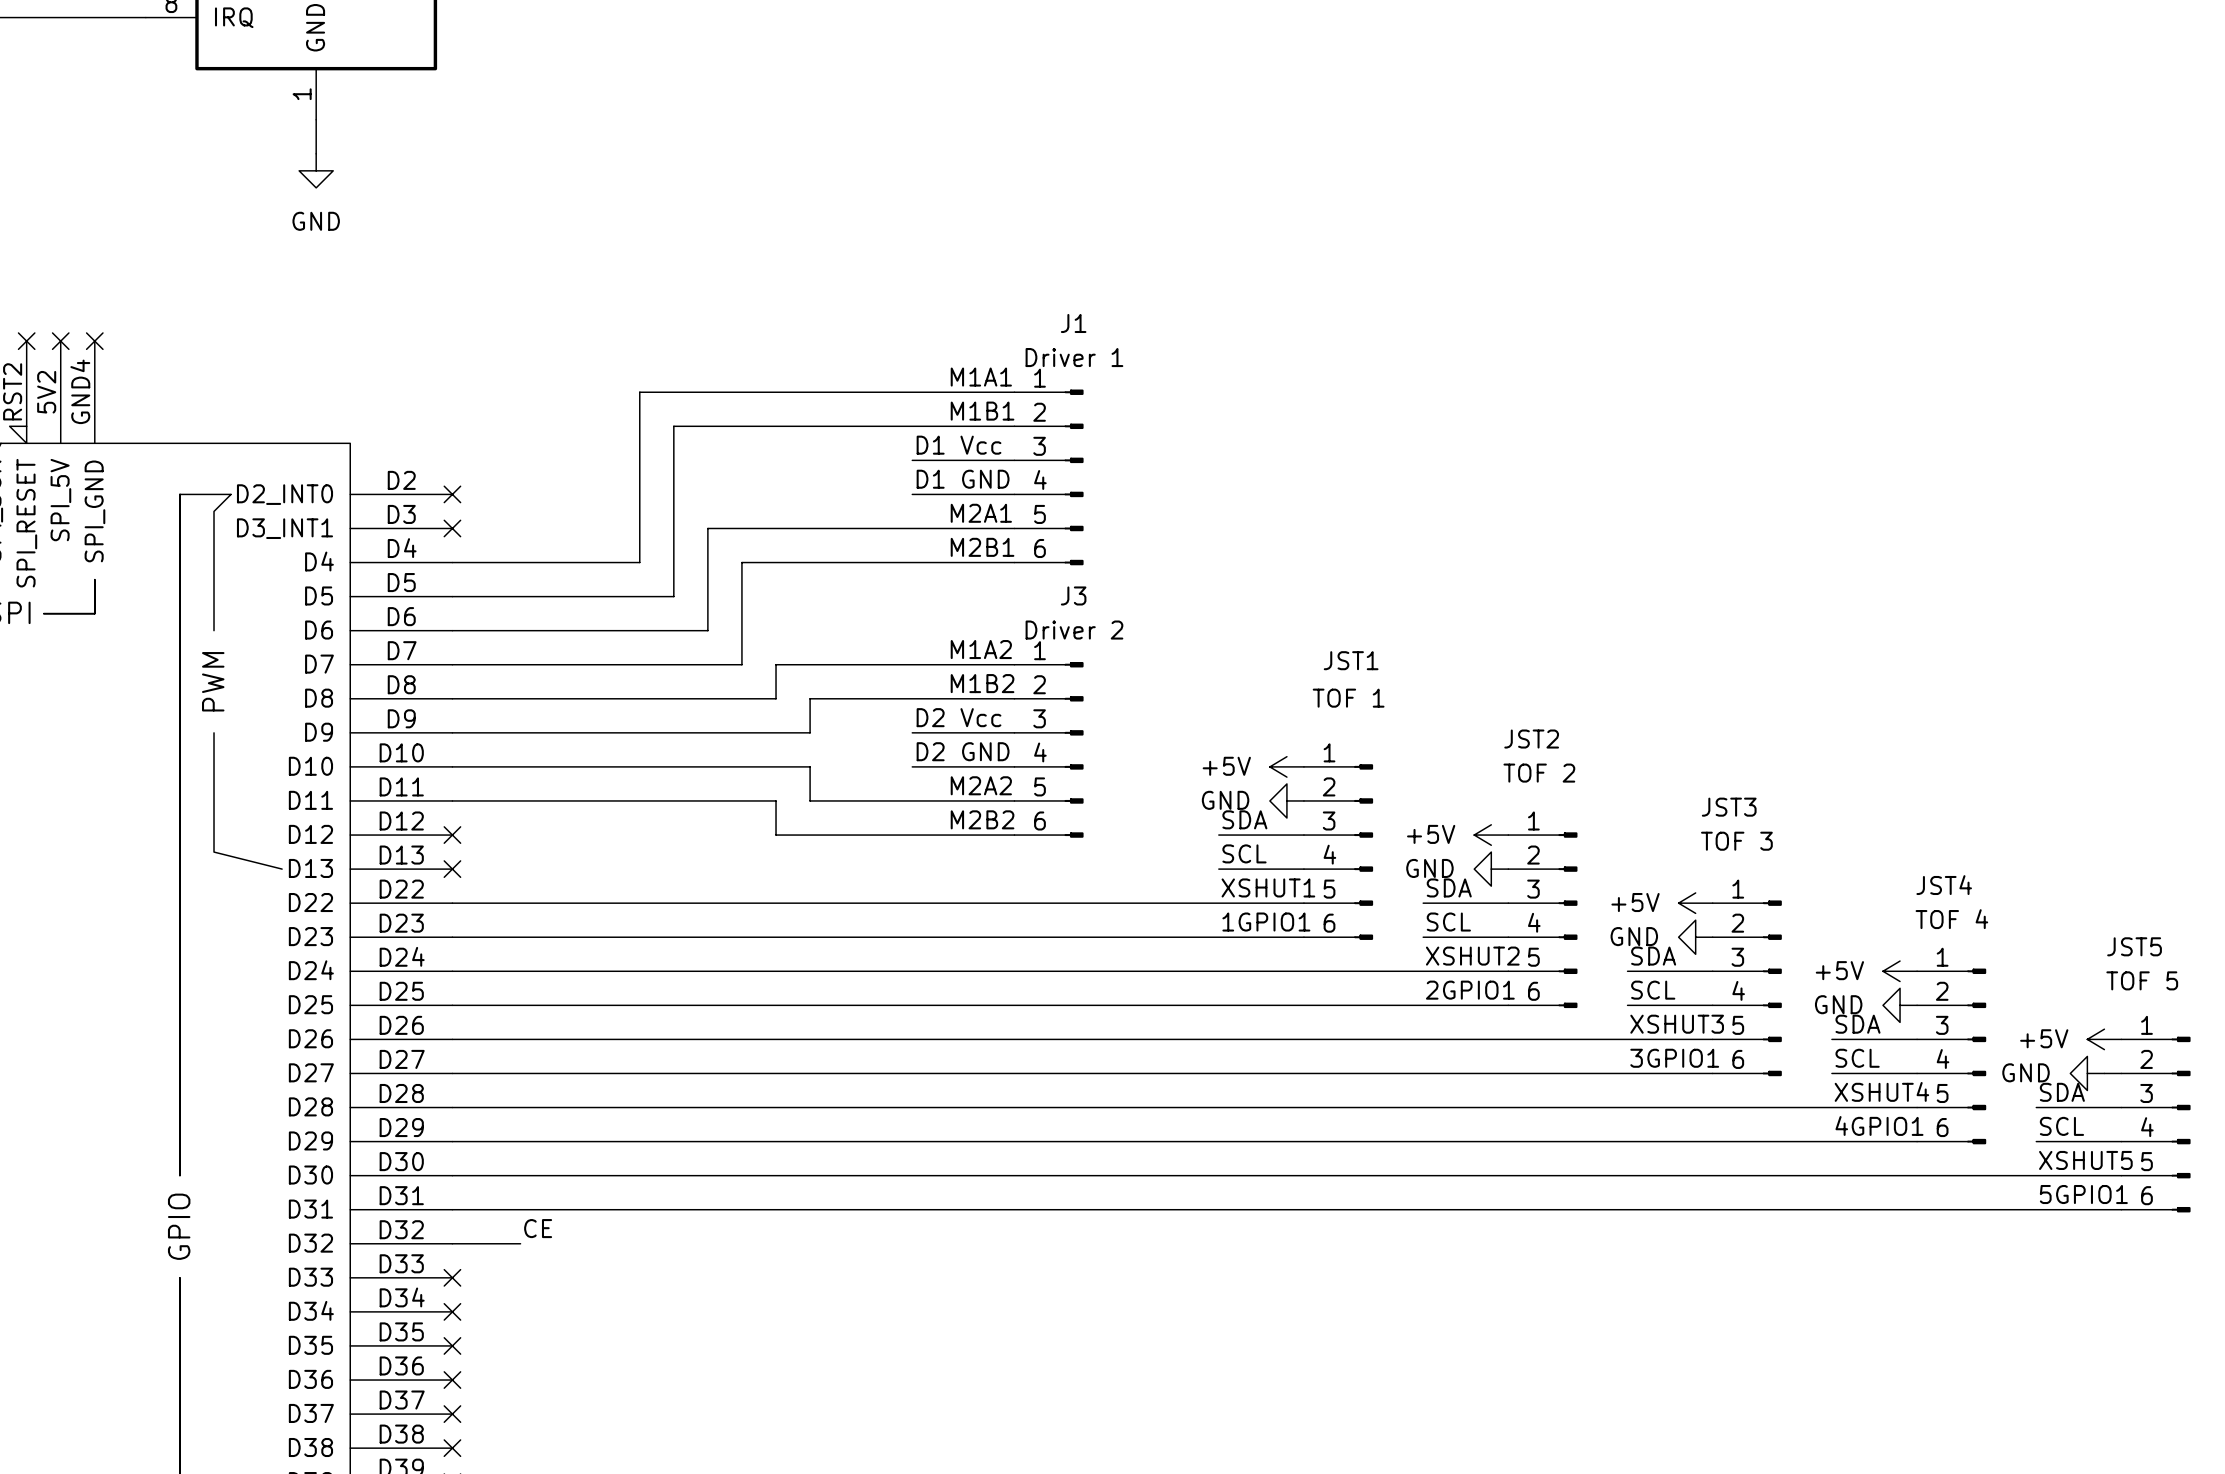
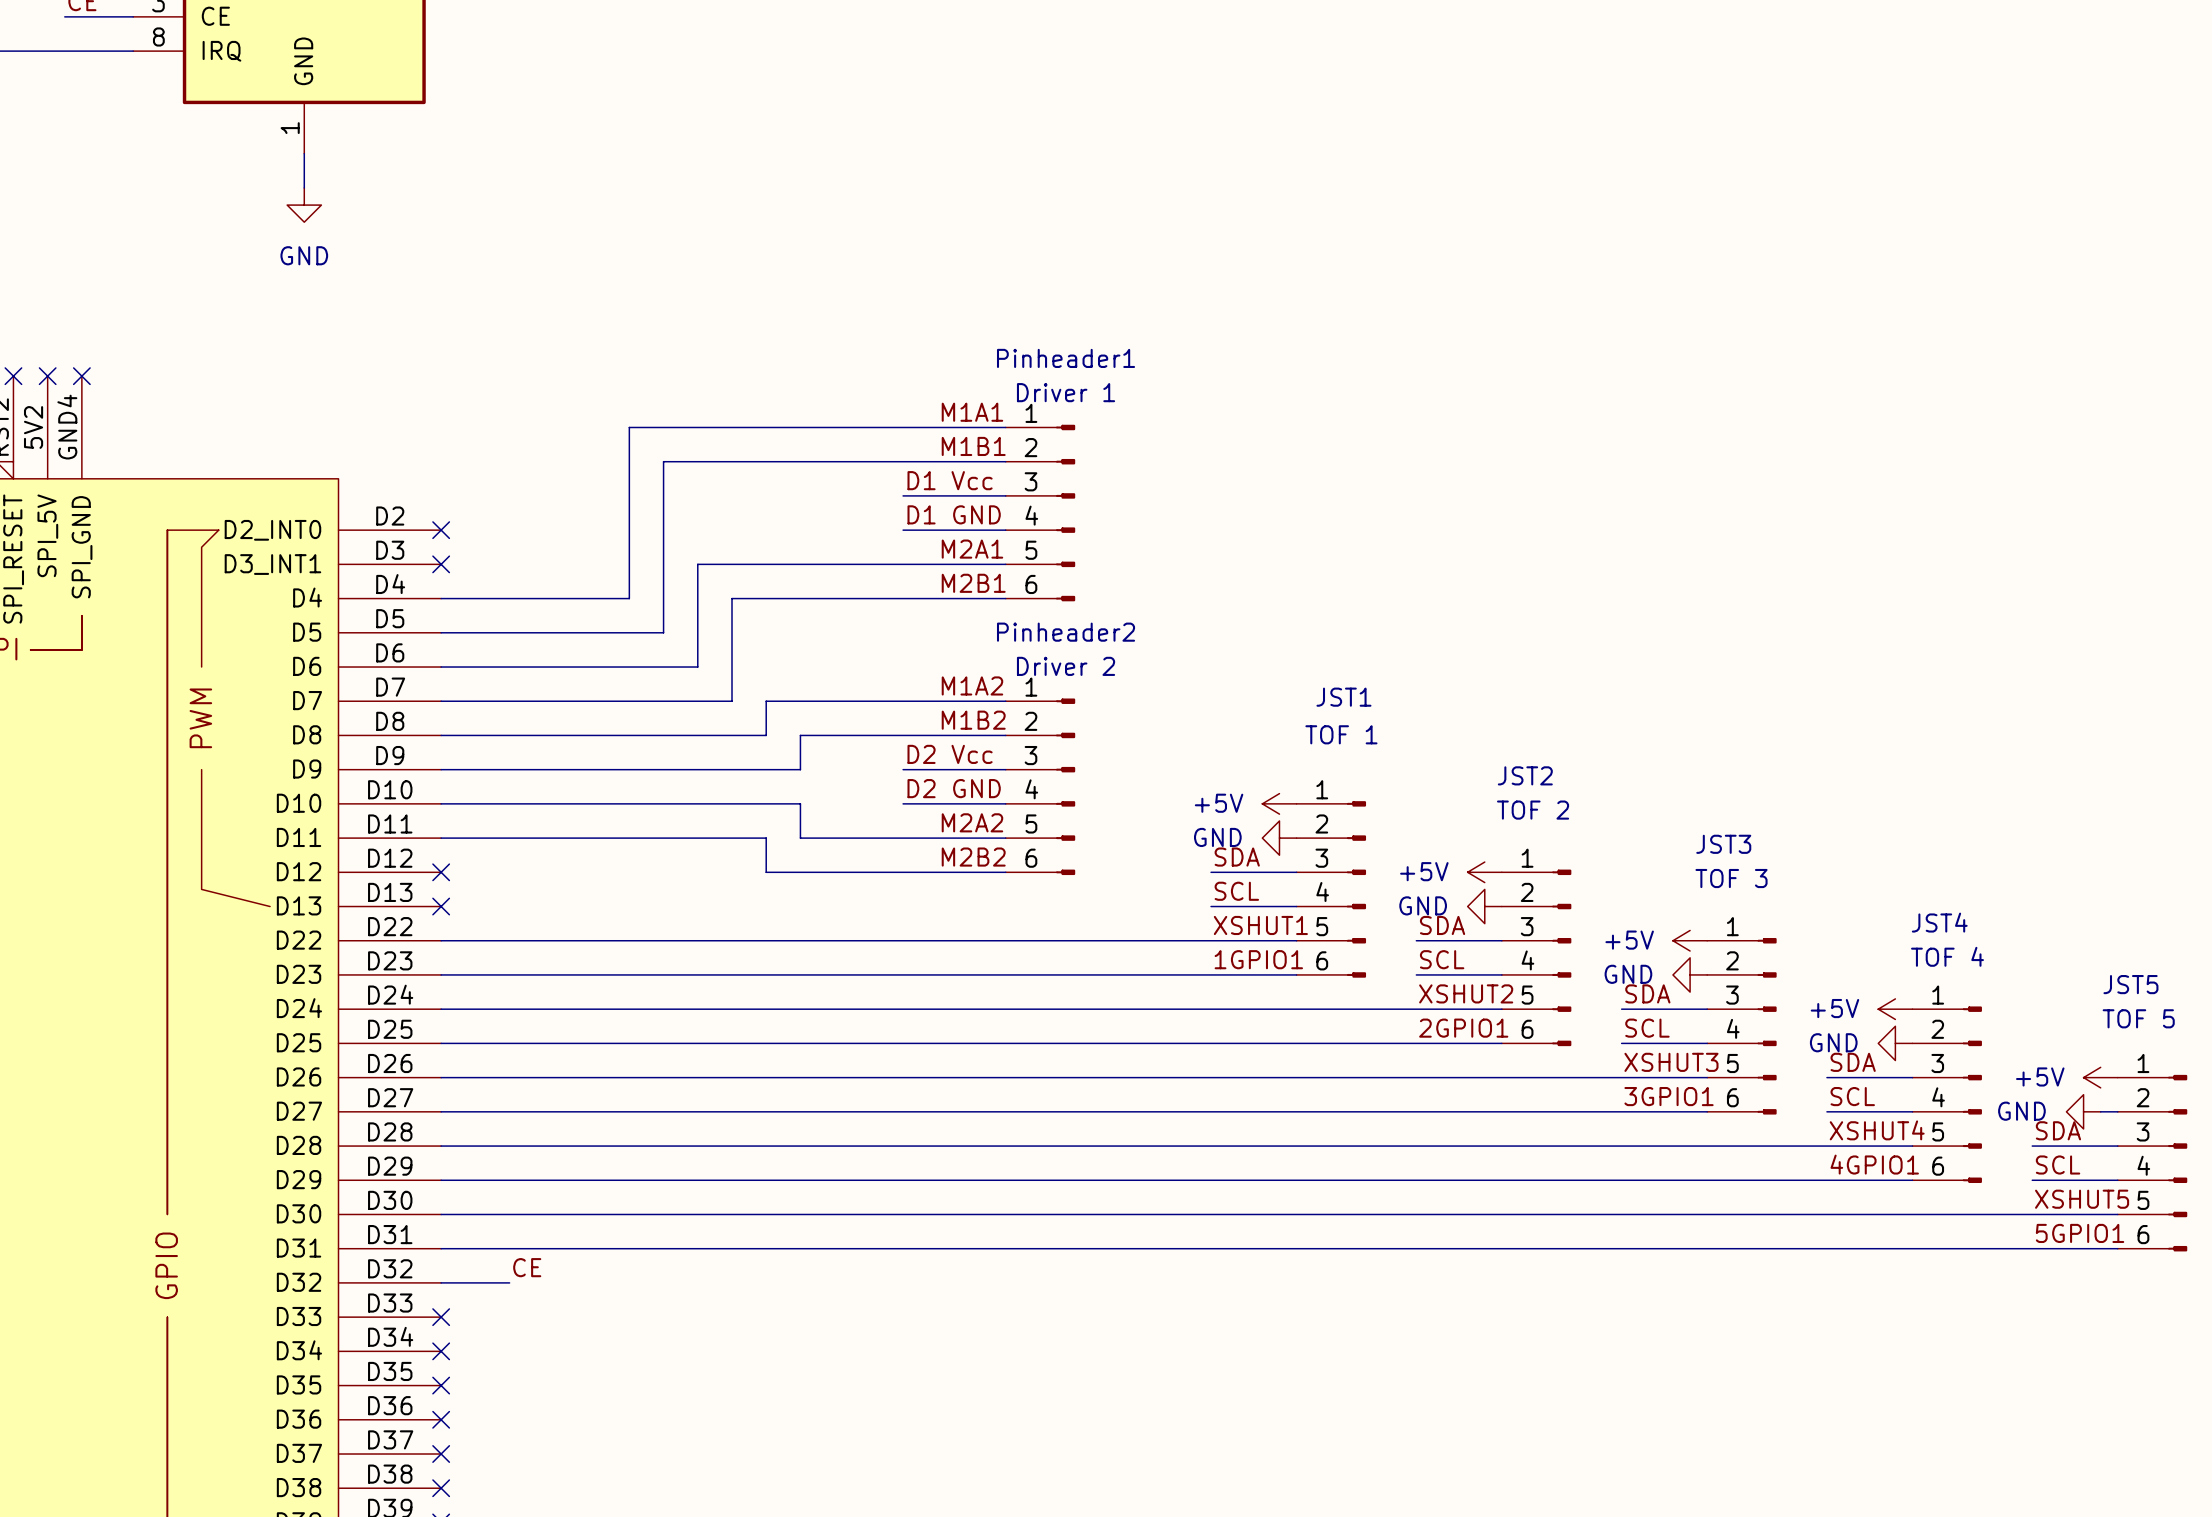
J1 name: J1 (1073, 323) -> Pinheader1 (1066, 358)
J3 name: J3 (1073, 595) -> Pinheader2 (1066, 632)

